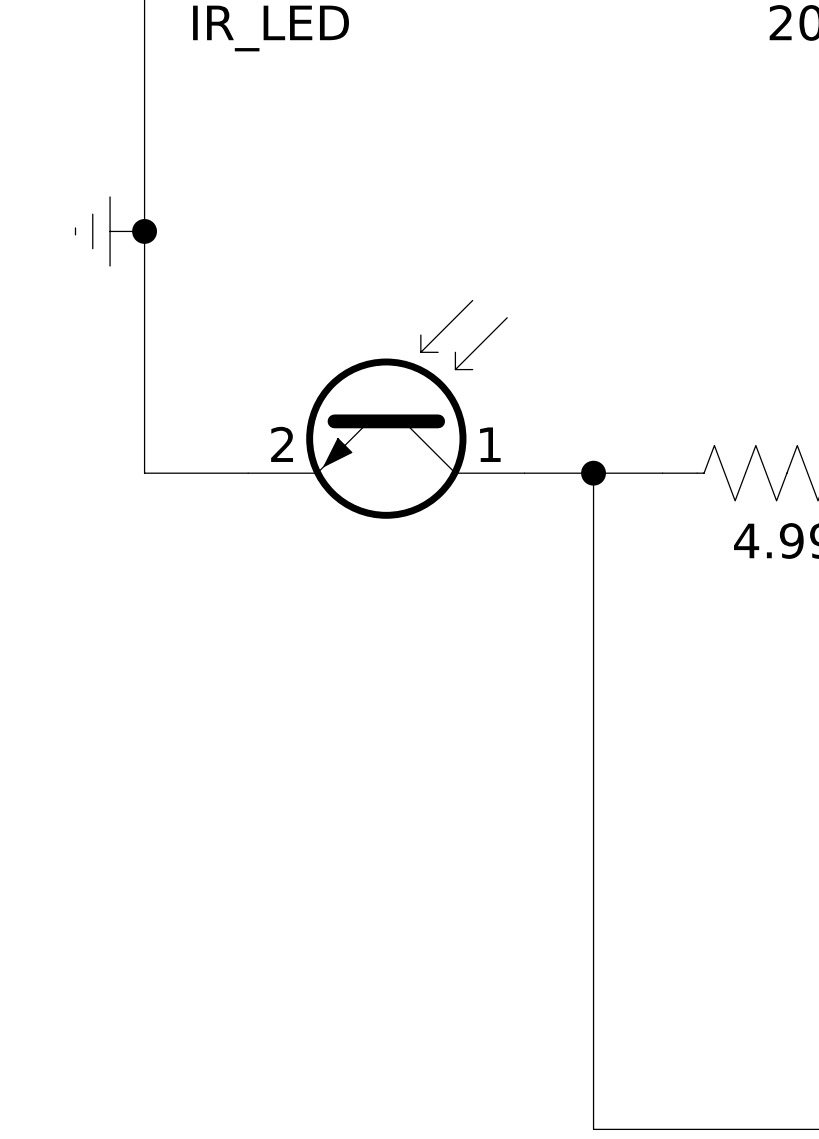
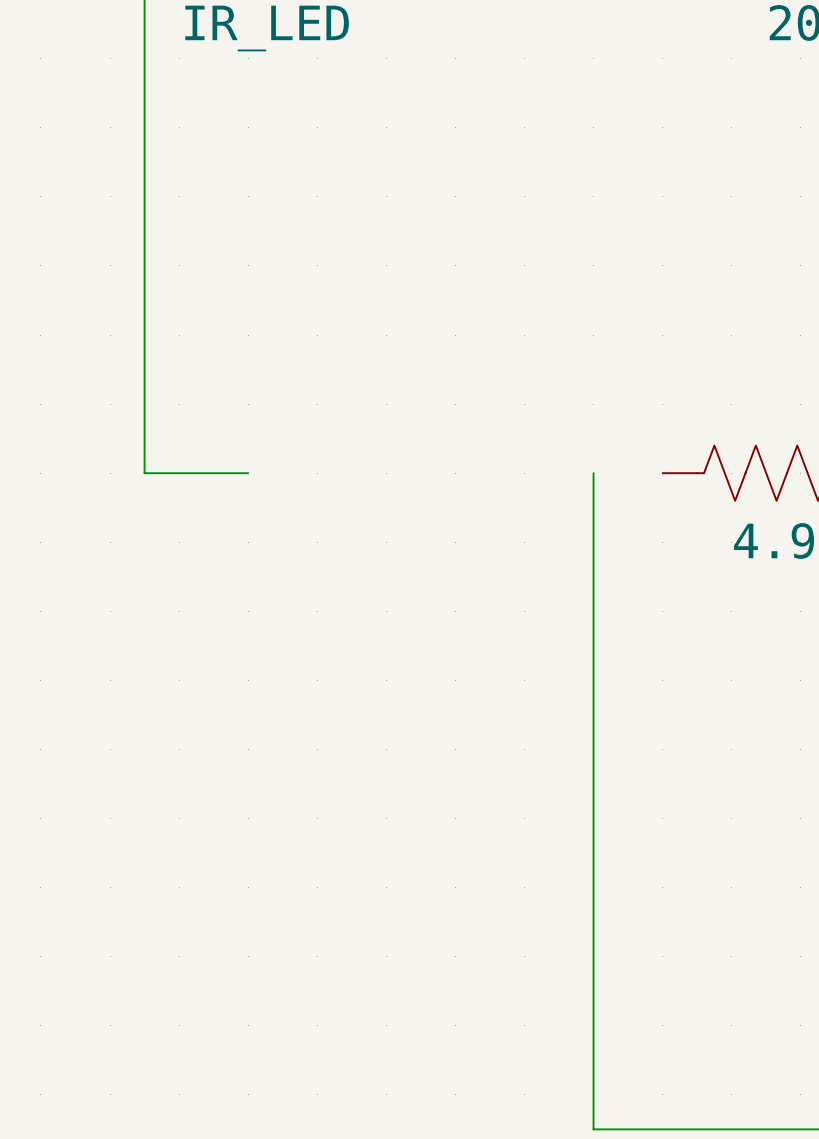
power symbol: (110, 231) -> none
junction: (144, 231) -> none
part: (386, 409) -> none
wire: (524, 473) (662, 473) -> none
junction: (593, 473) -> none

